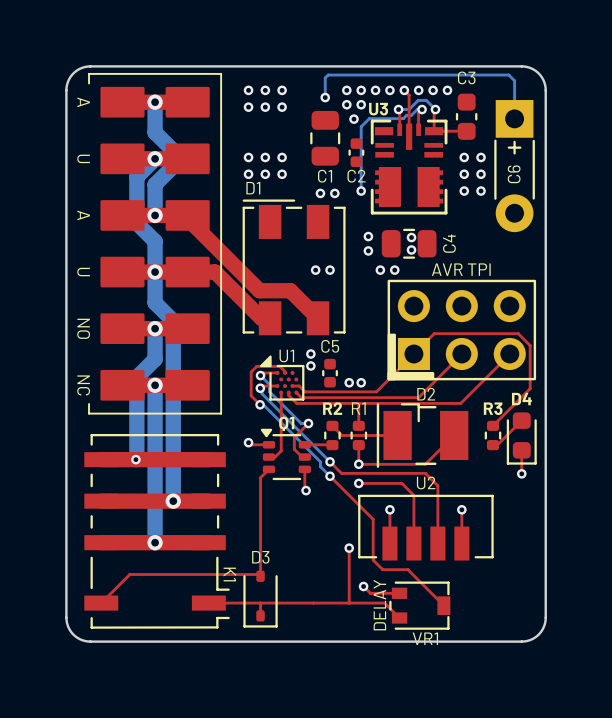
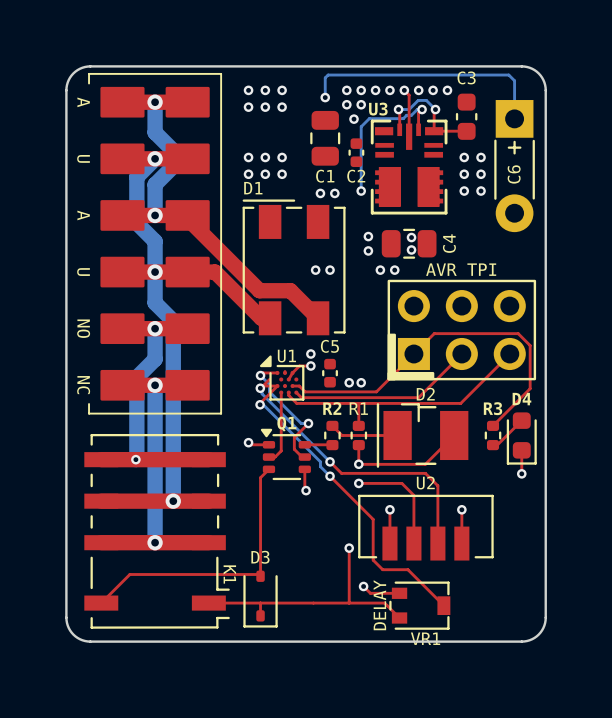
top track: none -> (310, 365) (299, 365) (288, 379)
top track: (285, 371) (279, 366) (256, 366) (251, 372) (251, 395) (260, 404) -> none
top track: none -> (269, 379) (260, 388)
top track: none -> (277, 386) (260, 401)

